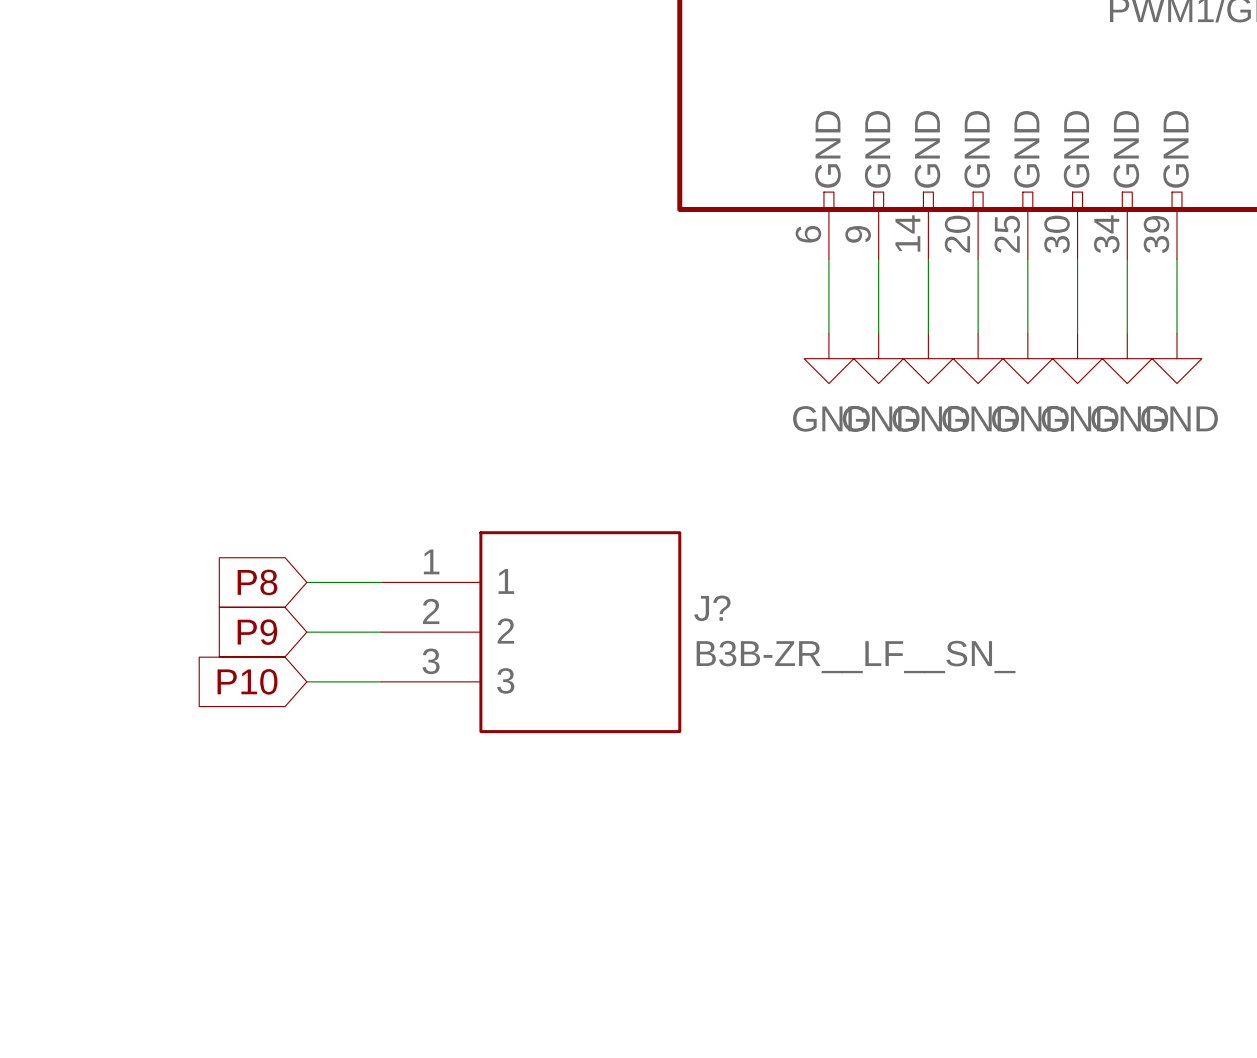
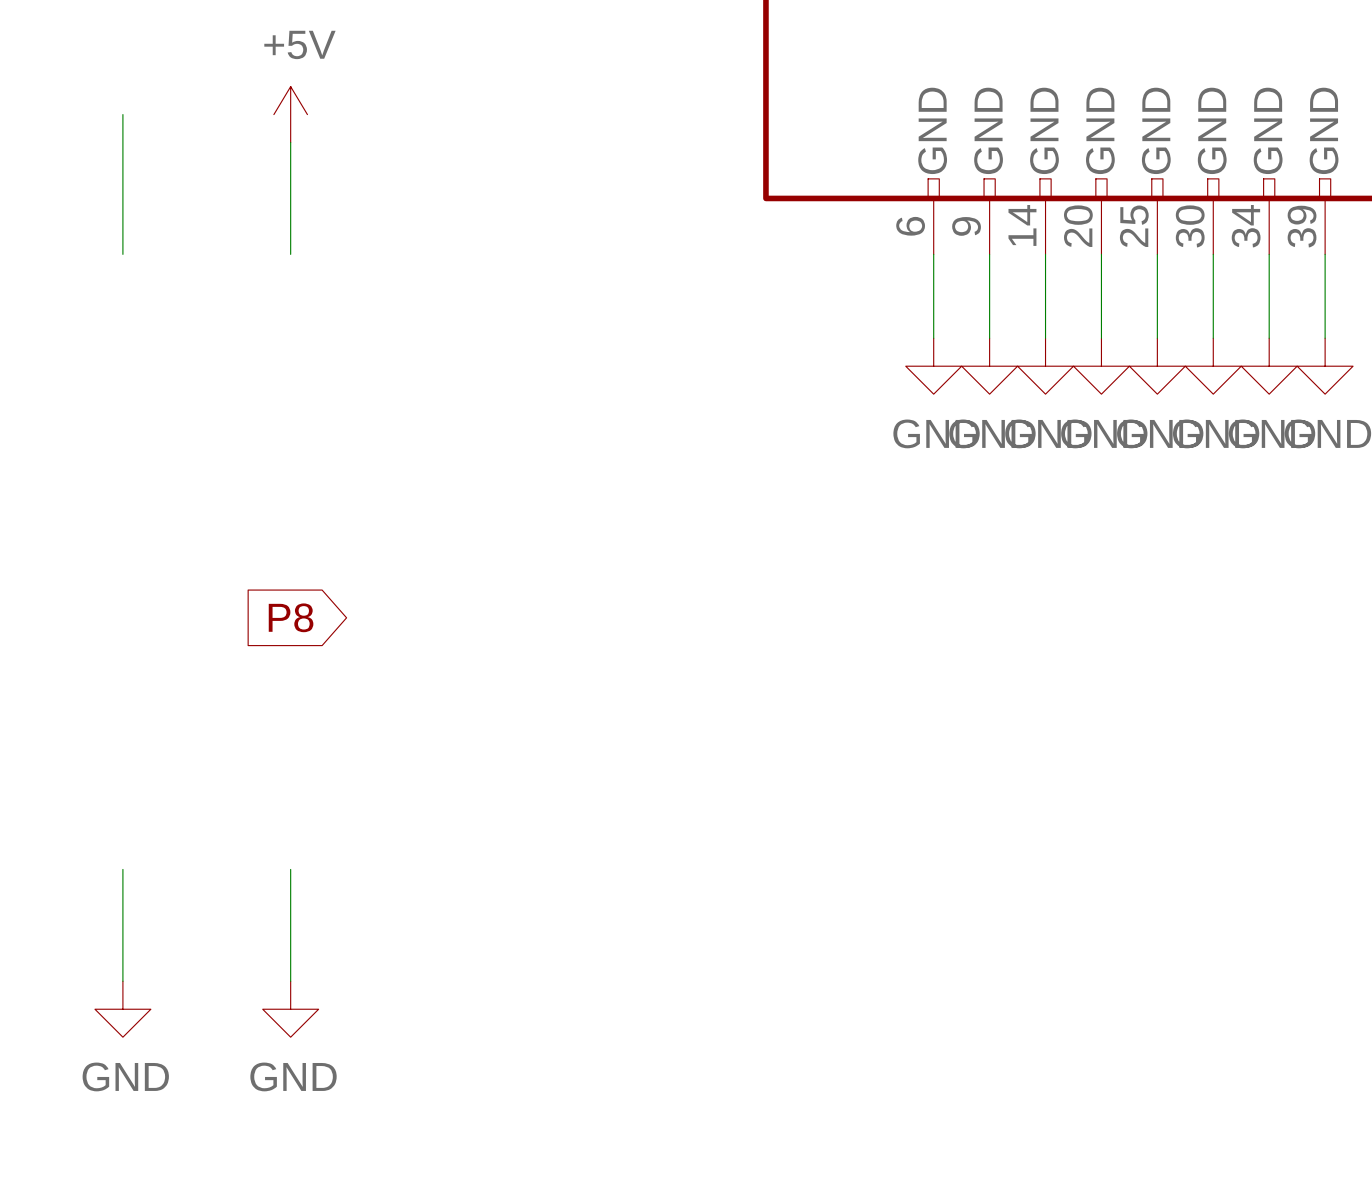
wire: none -> (122, 114) (122, 254)
power symbol: none -> +5V (290, 114)
wire: none -> (290, 142) (290, 254)
wire: (306, 582) (381, 582) -> none
global label: P9 (257, 632) -> none
wire: (306, 632) (381, 632) -> none
J?: B3B-ZR__LF__SN_ (531, 632) -> none
global label: P10 (247, 681) -> none
wire: (306, 681) (381, 681) -> none
wire: none -> (122, 869) (122, 981)
wire: none -> (290, 869) (290, 981)
power symbol: none -> GND (122, 1009)
power symbol: none -> GND (290, 1009)

